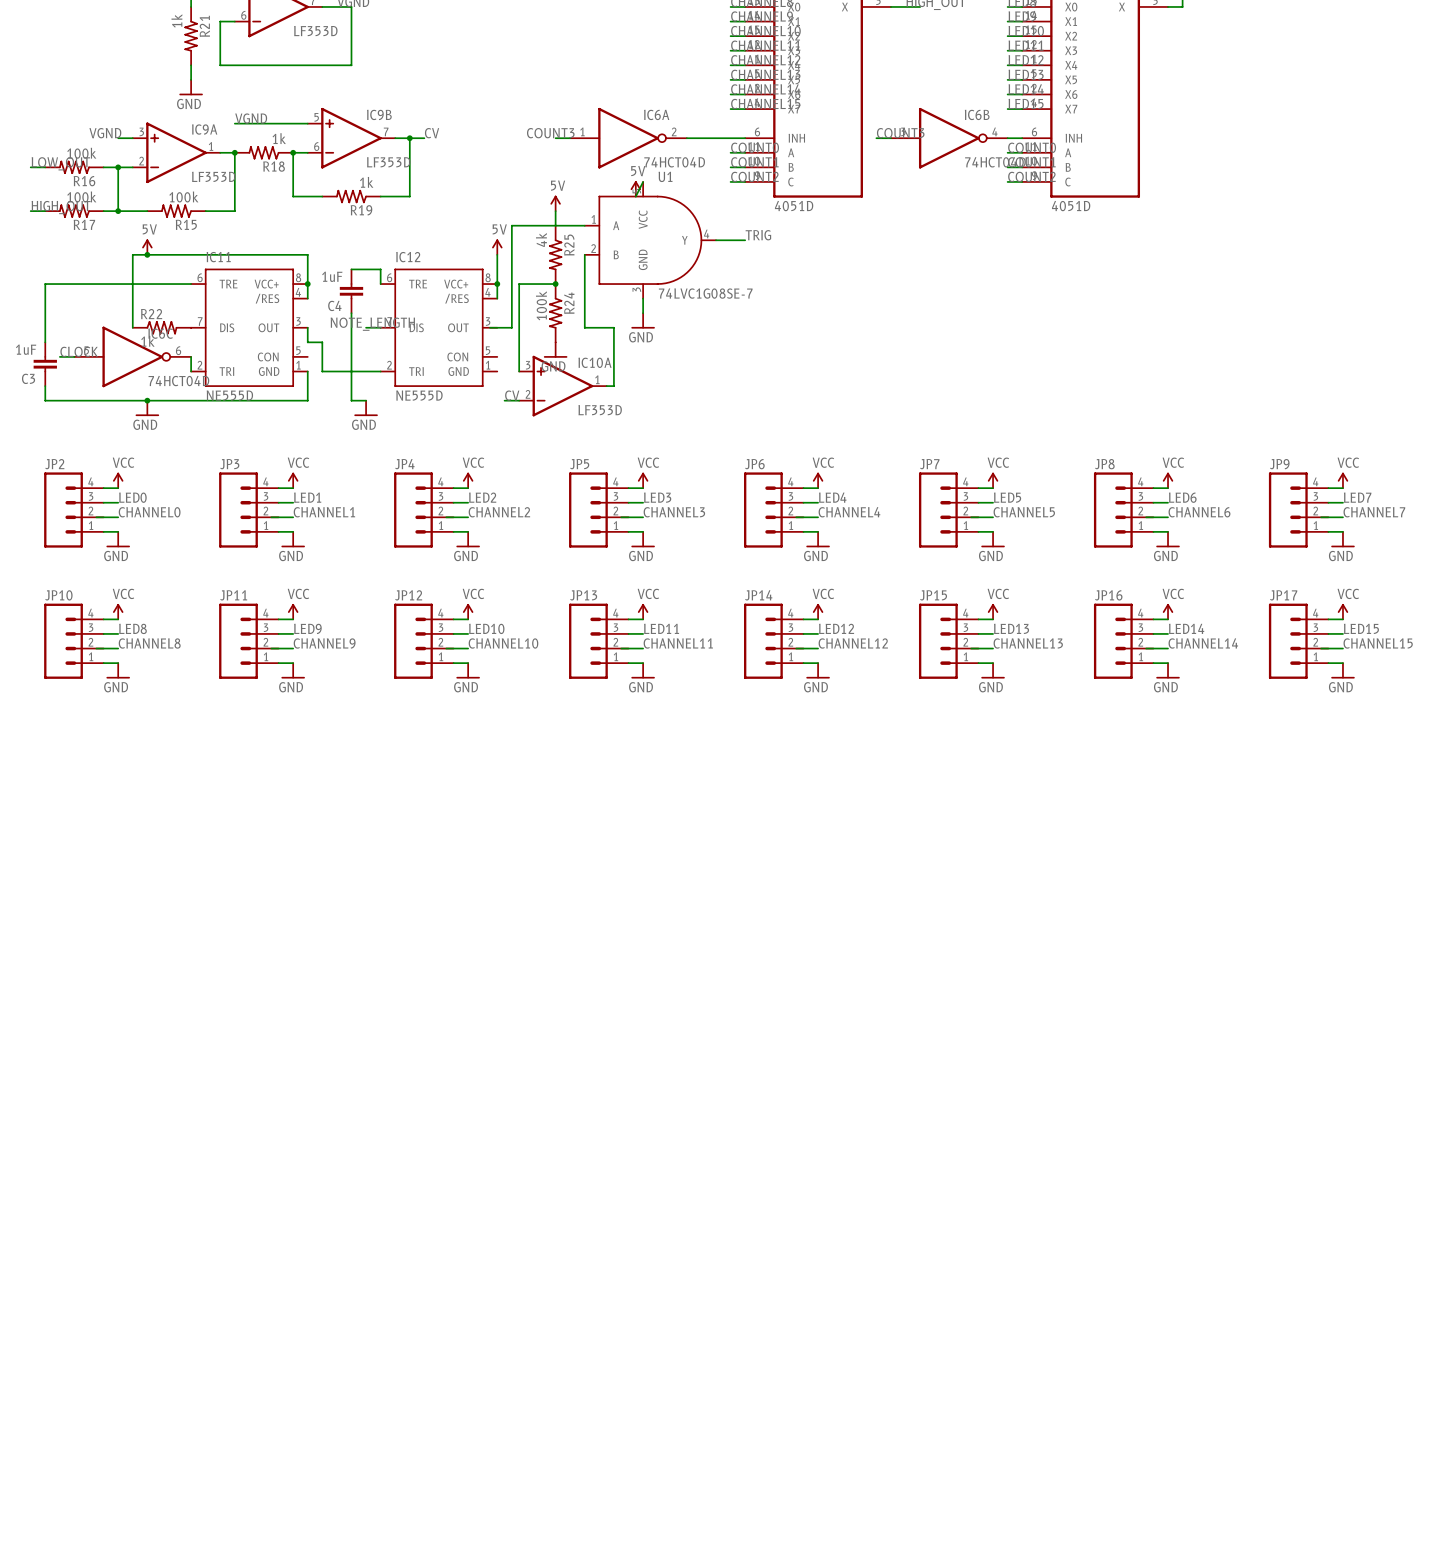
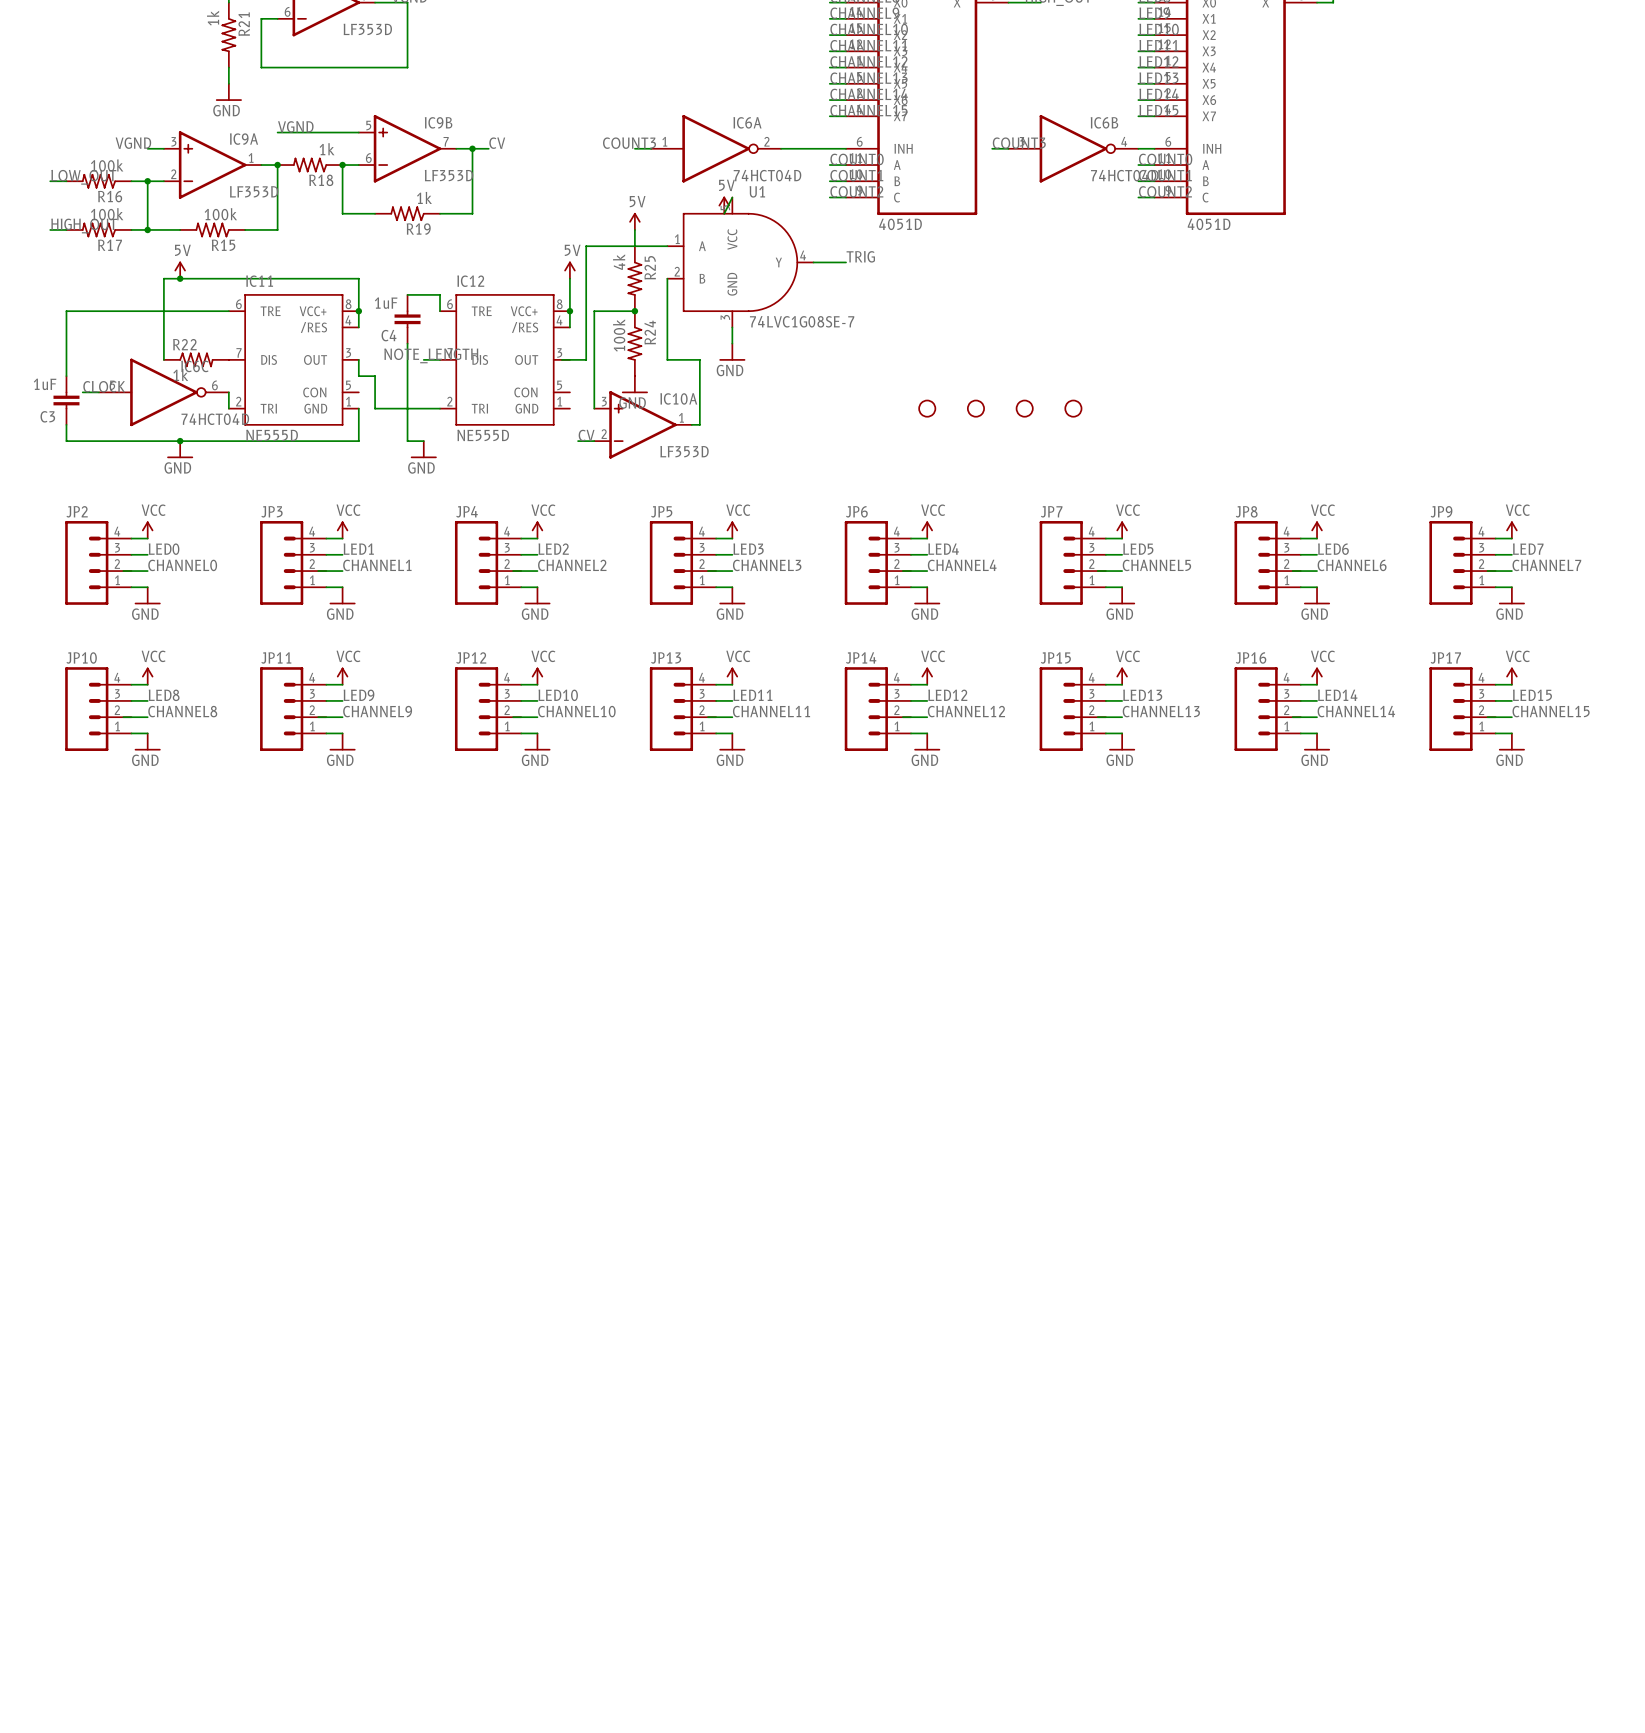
part: none -> (927, 408)
part: none -> (975, 408)
part: none -> (1024, 408)
part: none -> (1073, 408)

